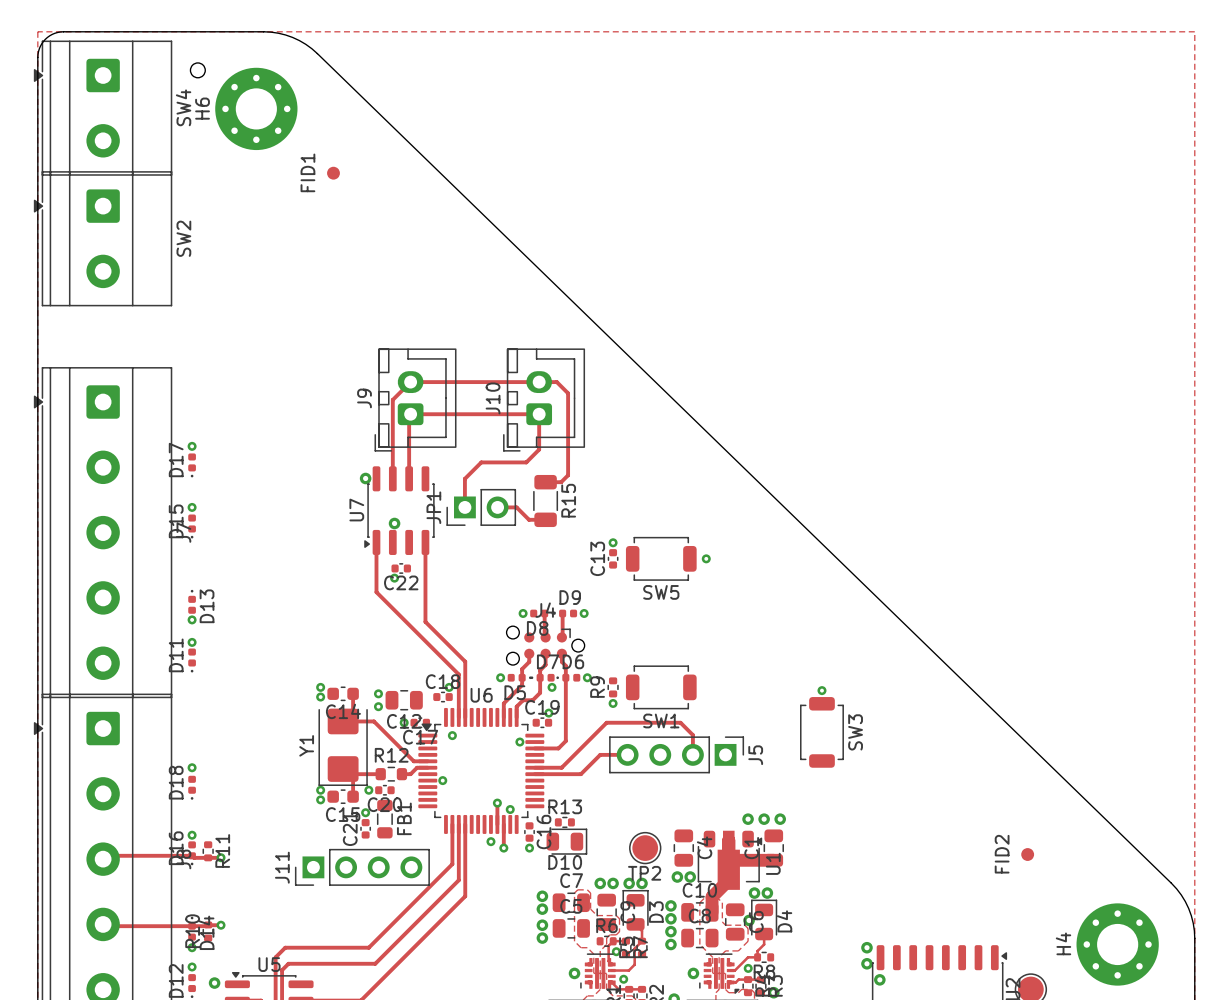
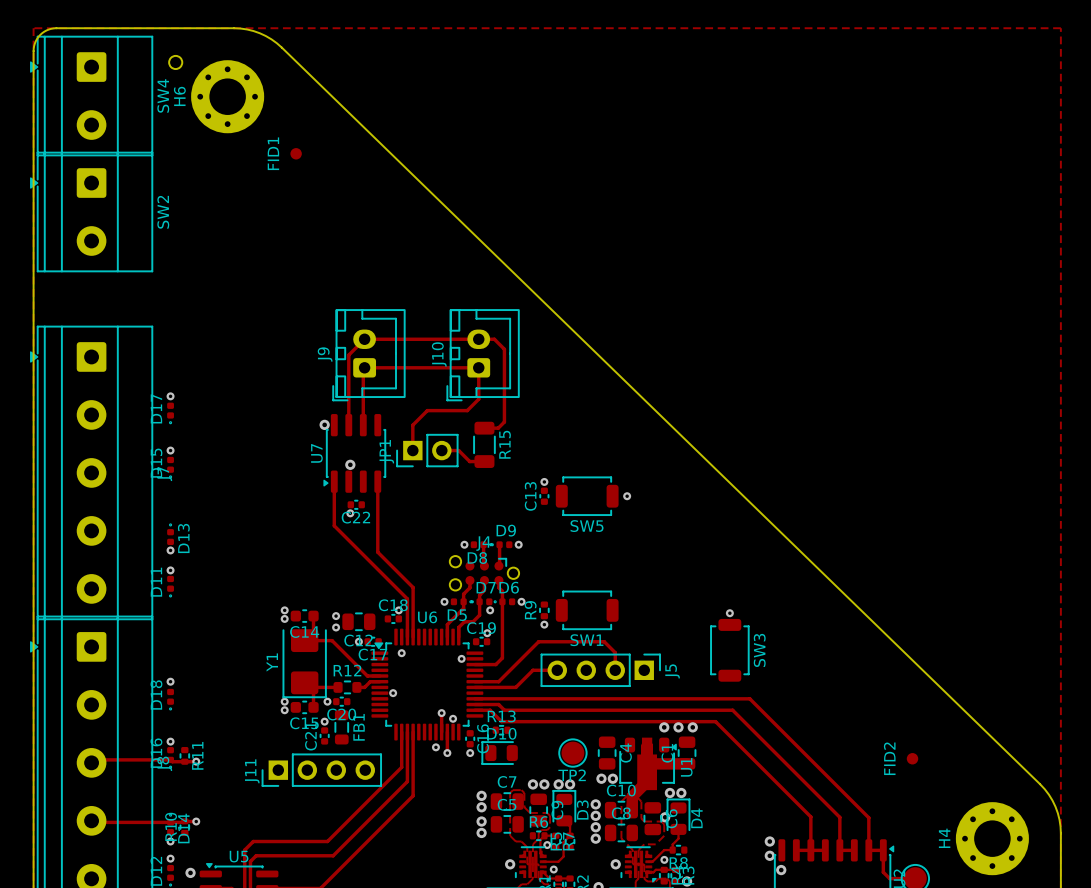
track: none -> (474, 698) (749, 698) (868, 817) (868, 850) (883, 850) (883, 872) (889, 878) (915, 878)
track: none -> (474, 704) (498, 704) (504, 710) (732, 710) (839, 817) (839, 850) (854, 850)
track: none -> (474, 710) (490, 710) (501, 721) (715, 721) (810, 816) (810, 850)
D10 rotation: 0° (566, 841) -> 180° (499, 753)
track: none -> (796, 850) (825, 850)

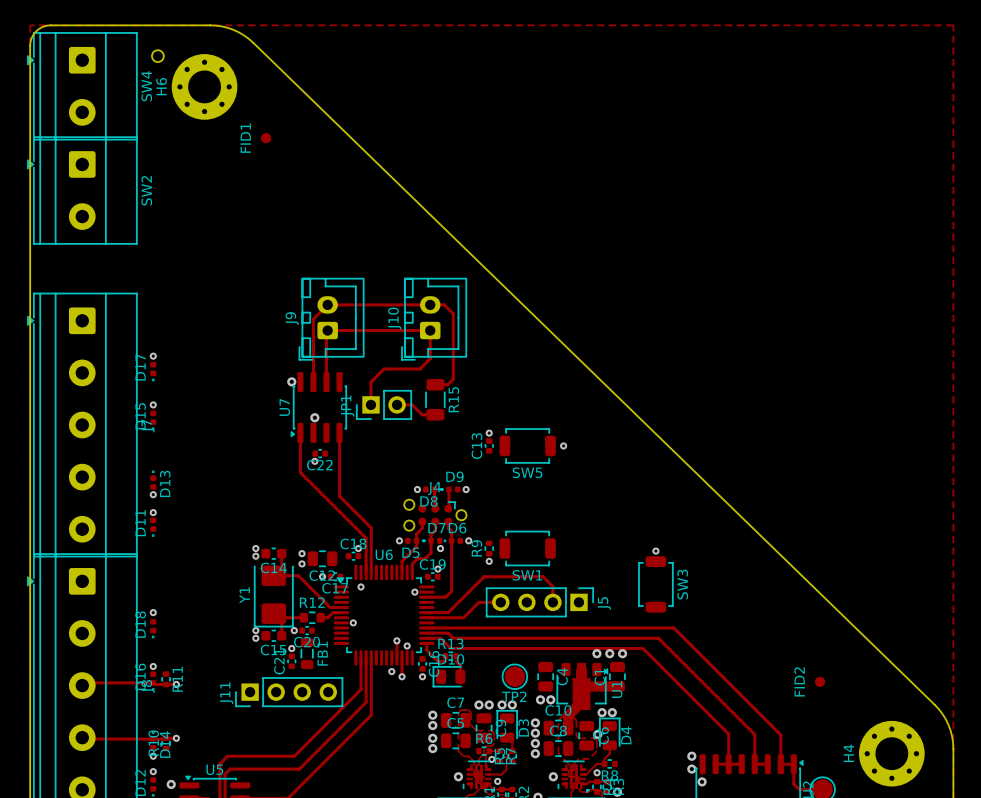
track: none -> (426, 643) (426, 650) (437, 661) (445, 661)
track: none -> (455, 661) (460, 665) (460, 676)

